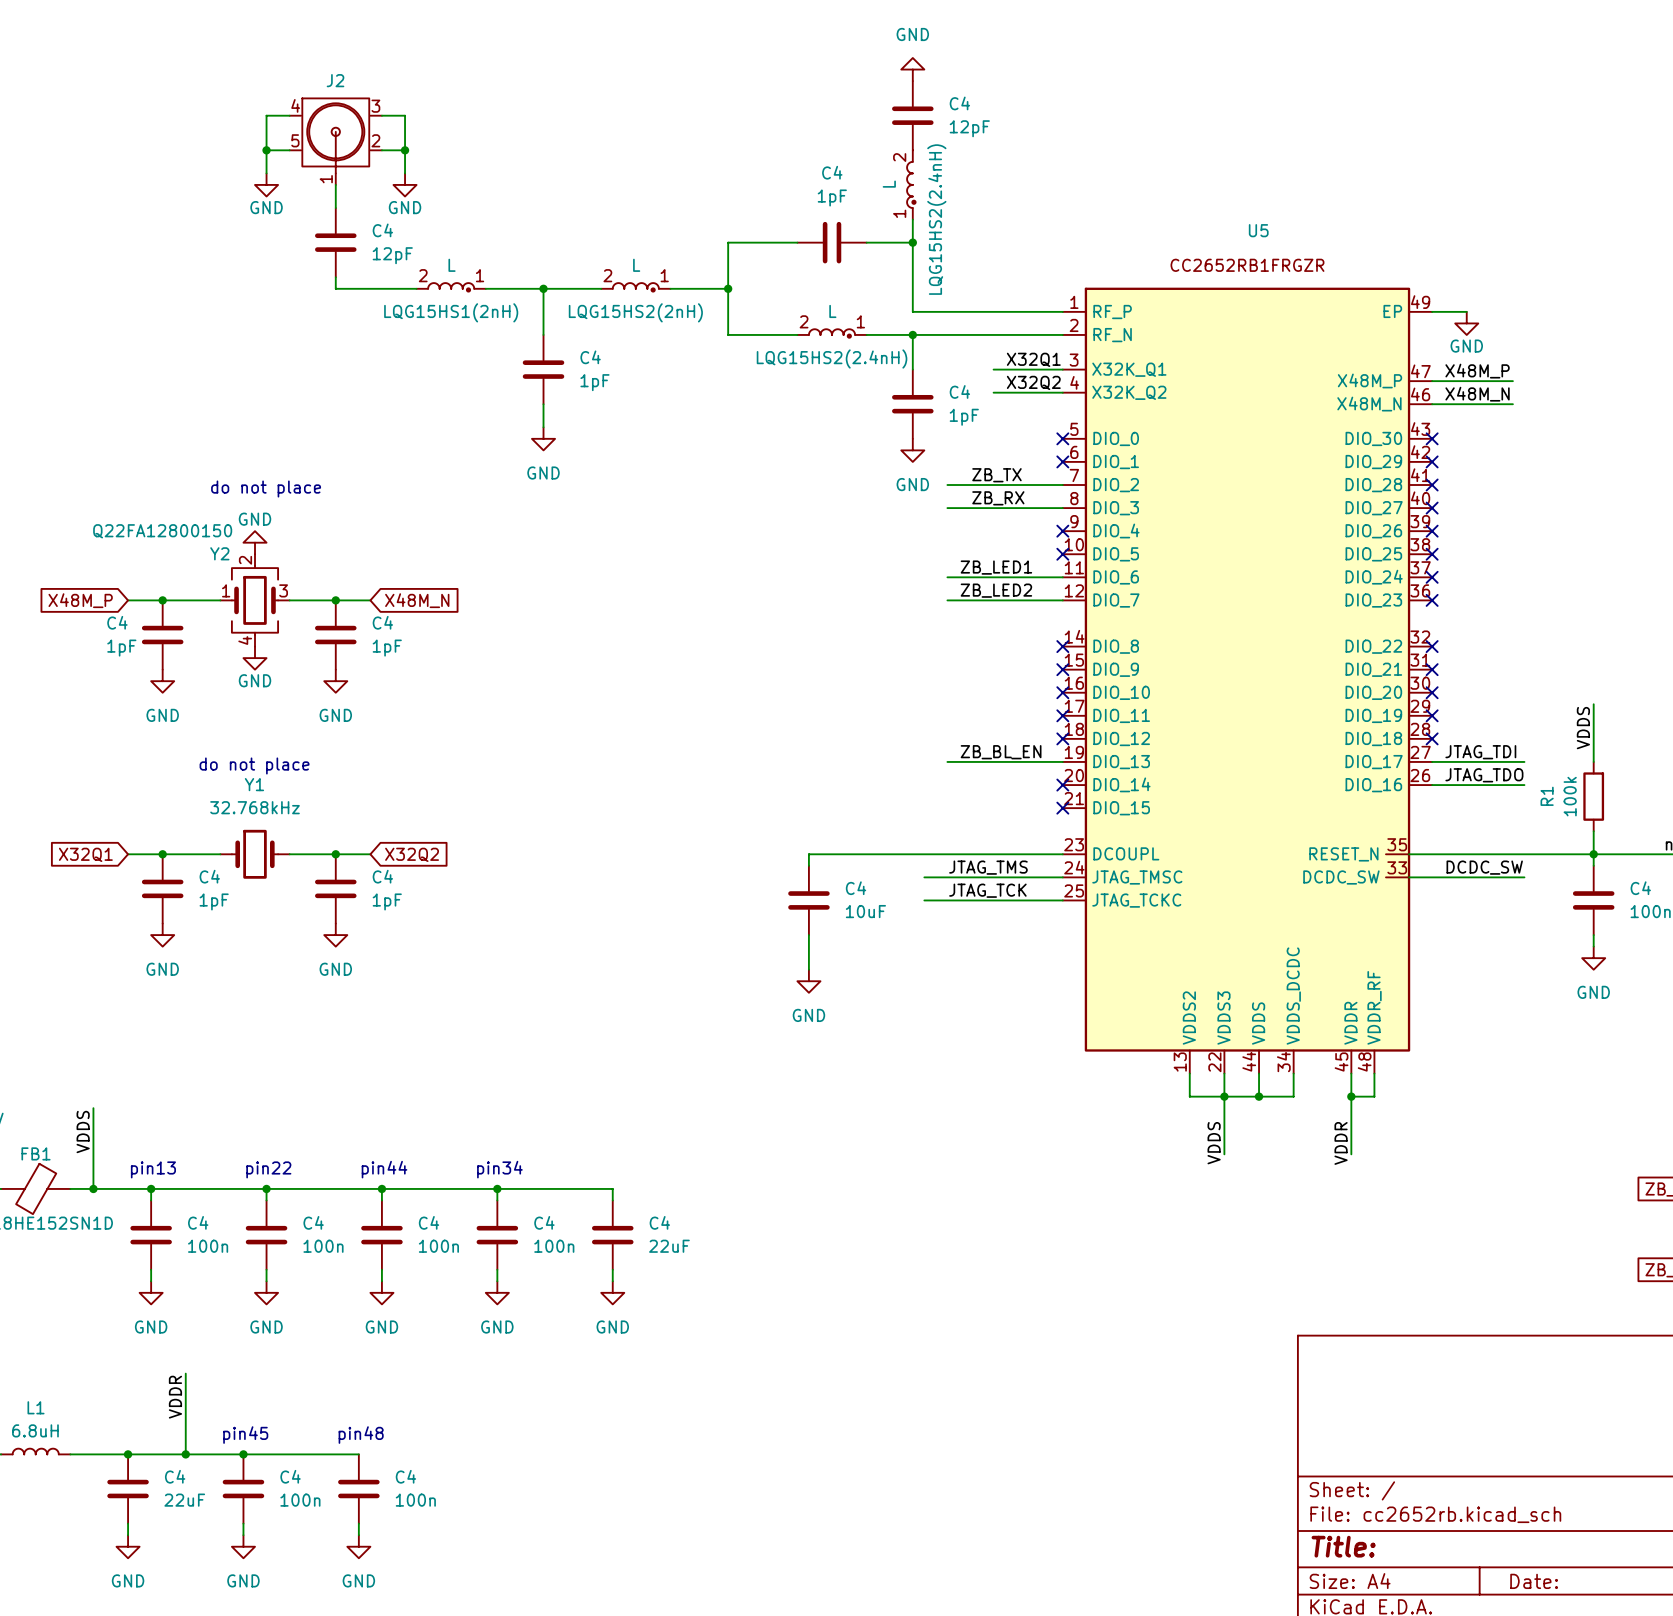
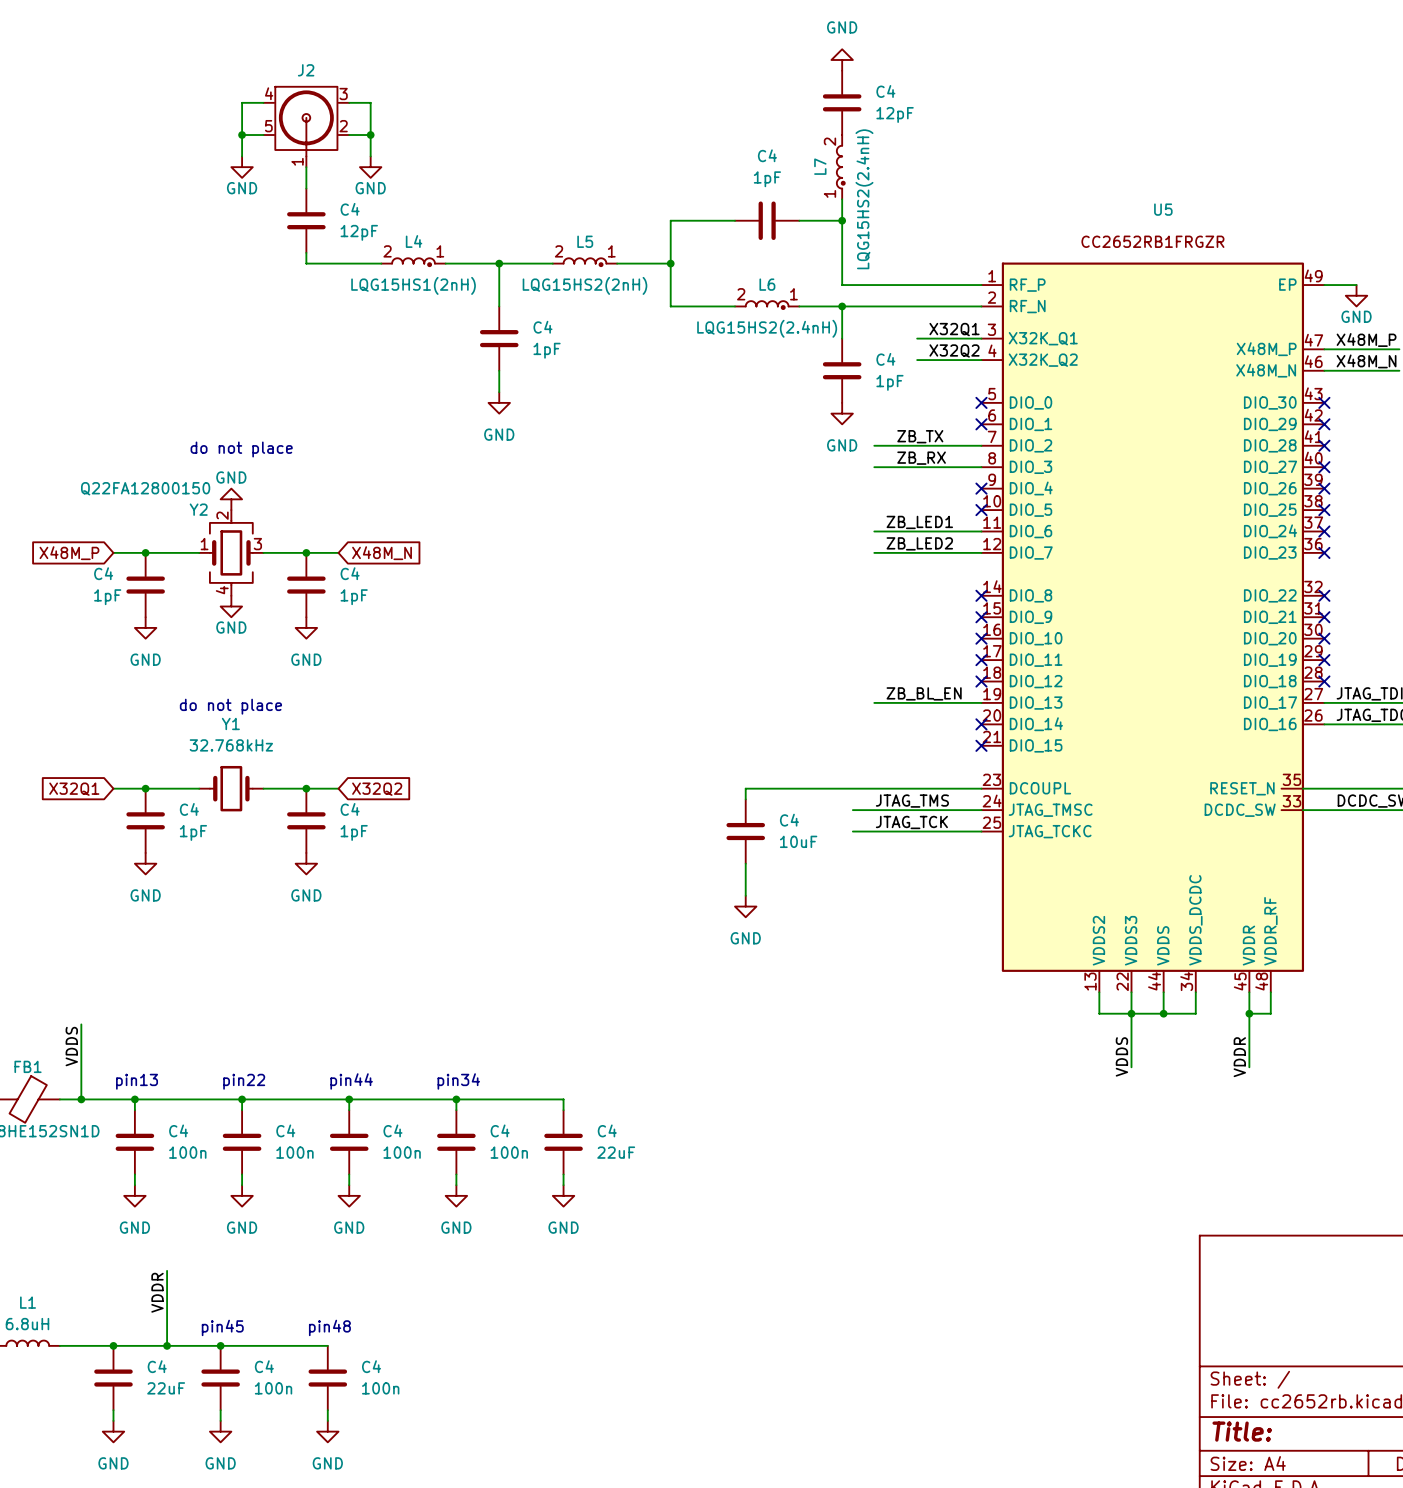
L name: L (889, 184) -> L7 (820, 166)
L name: L (452, 265) -> L4 (414, 241)
L name: L (636, 265) -> L5 (585, 241)
L name: L (832, 311) -> L6 (767, 284)

